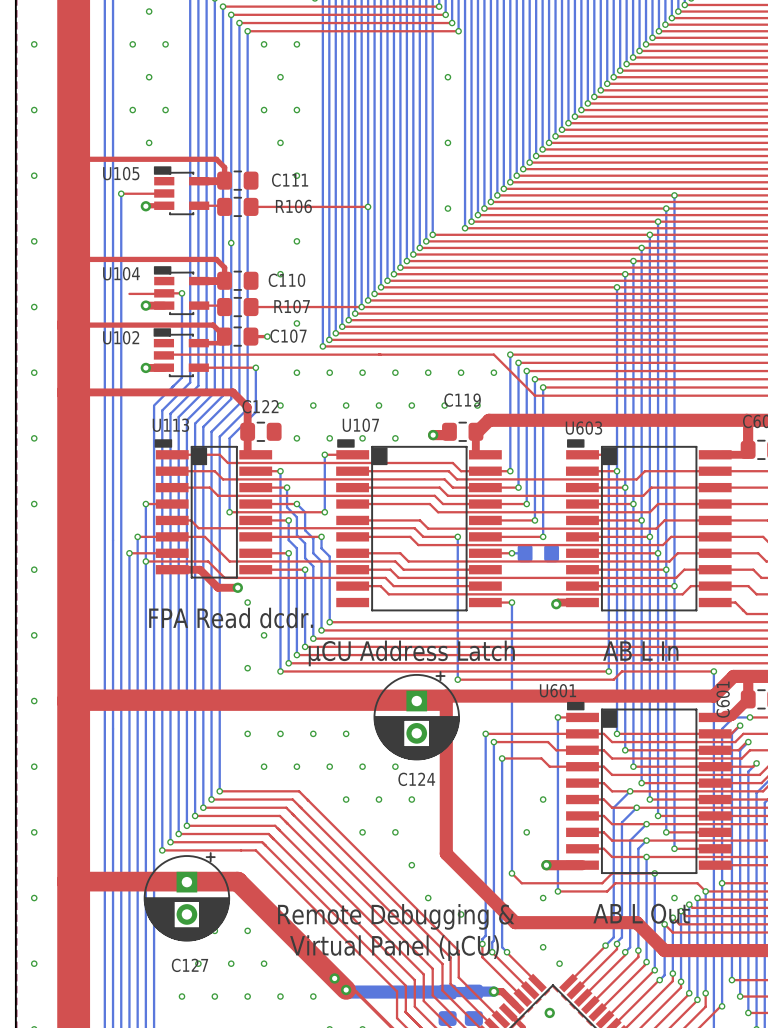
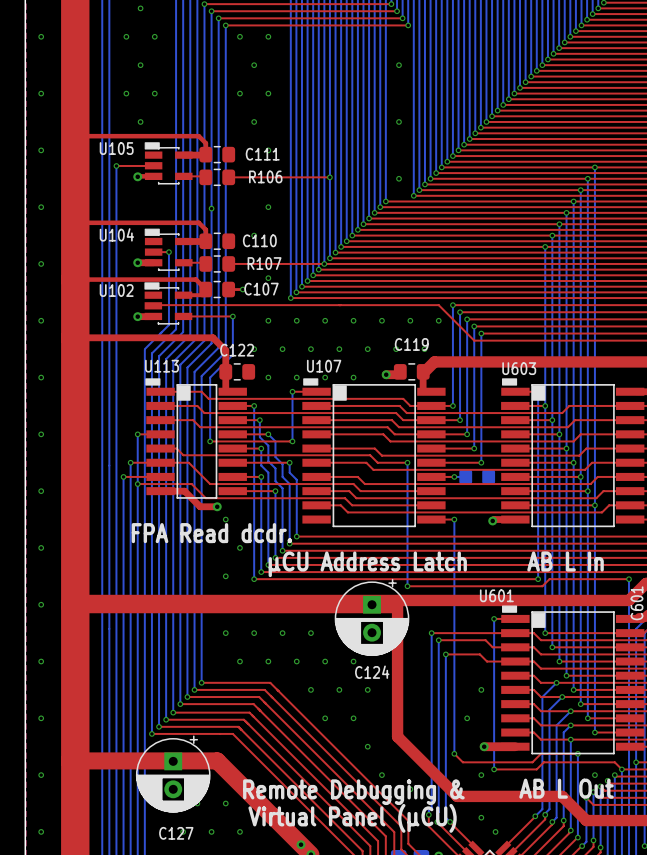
top track: (129, 293) (165, 293) -> none

